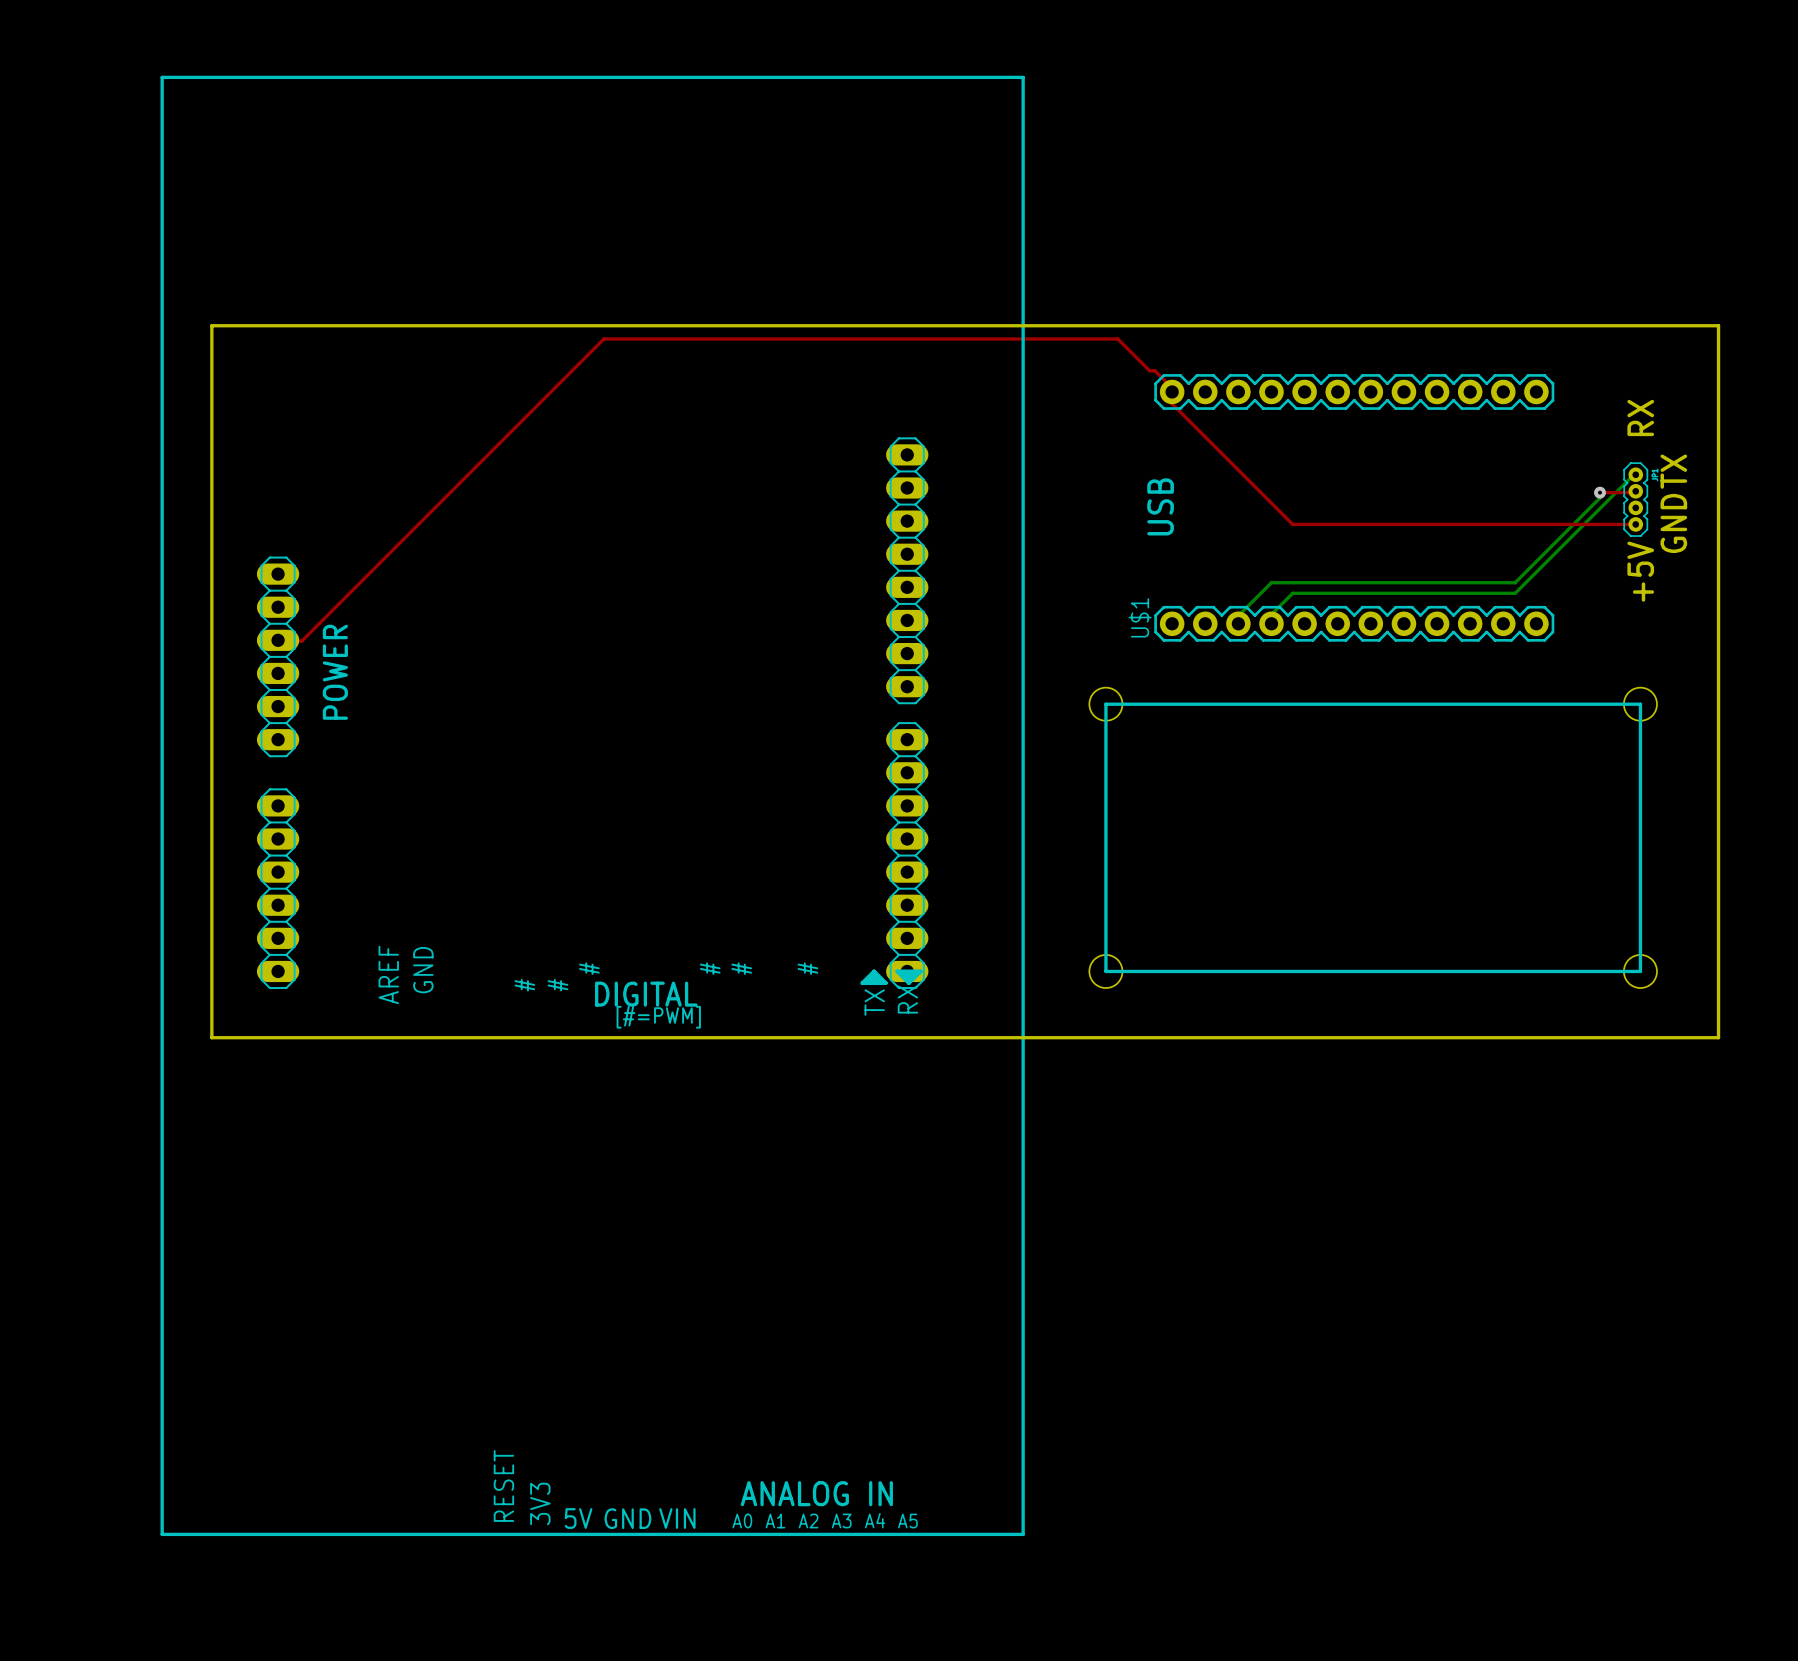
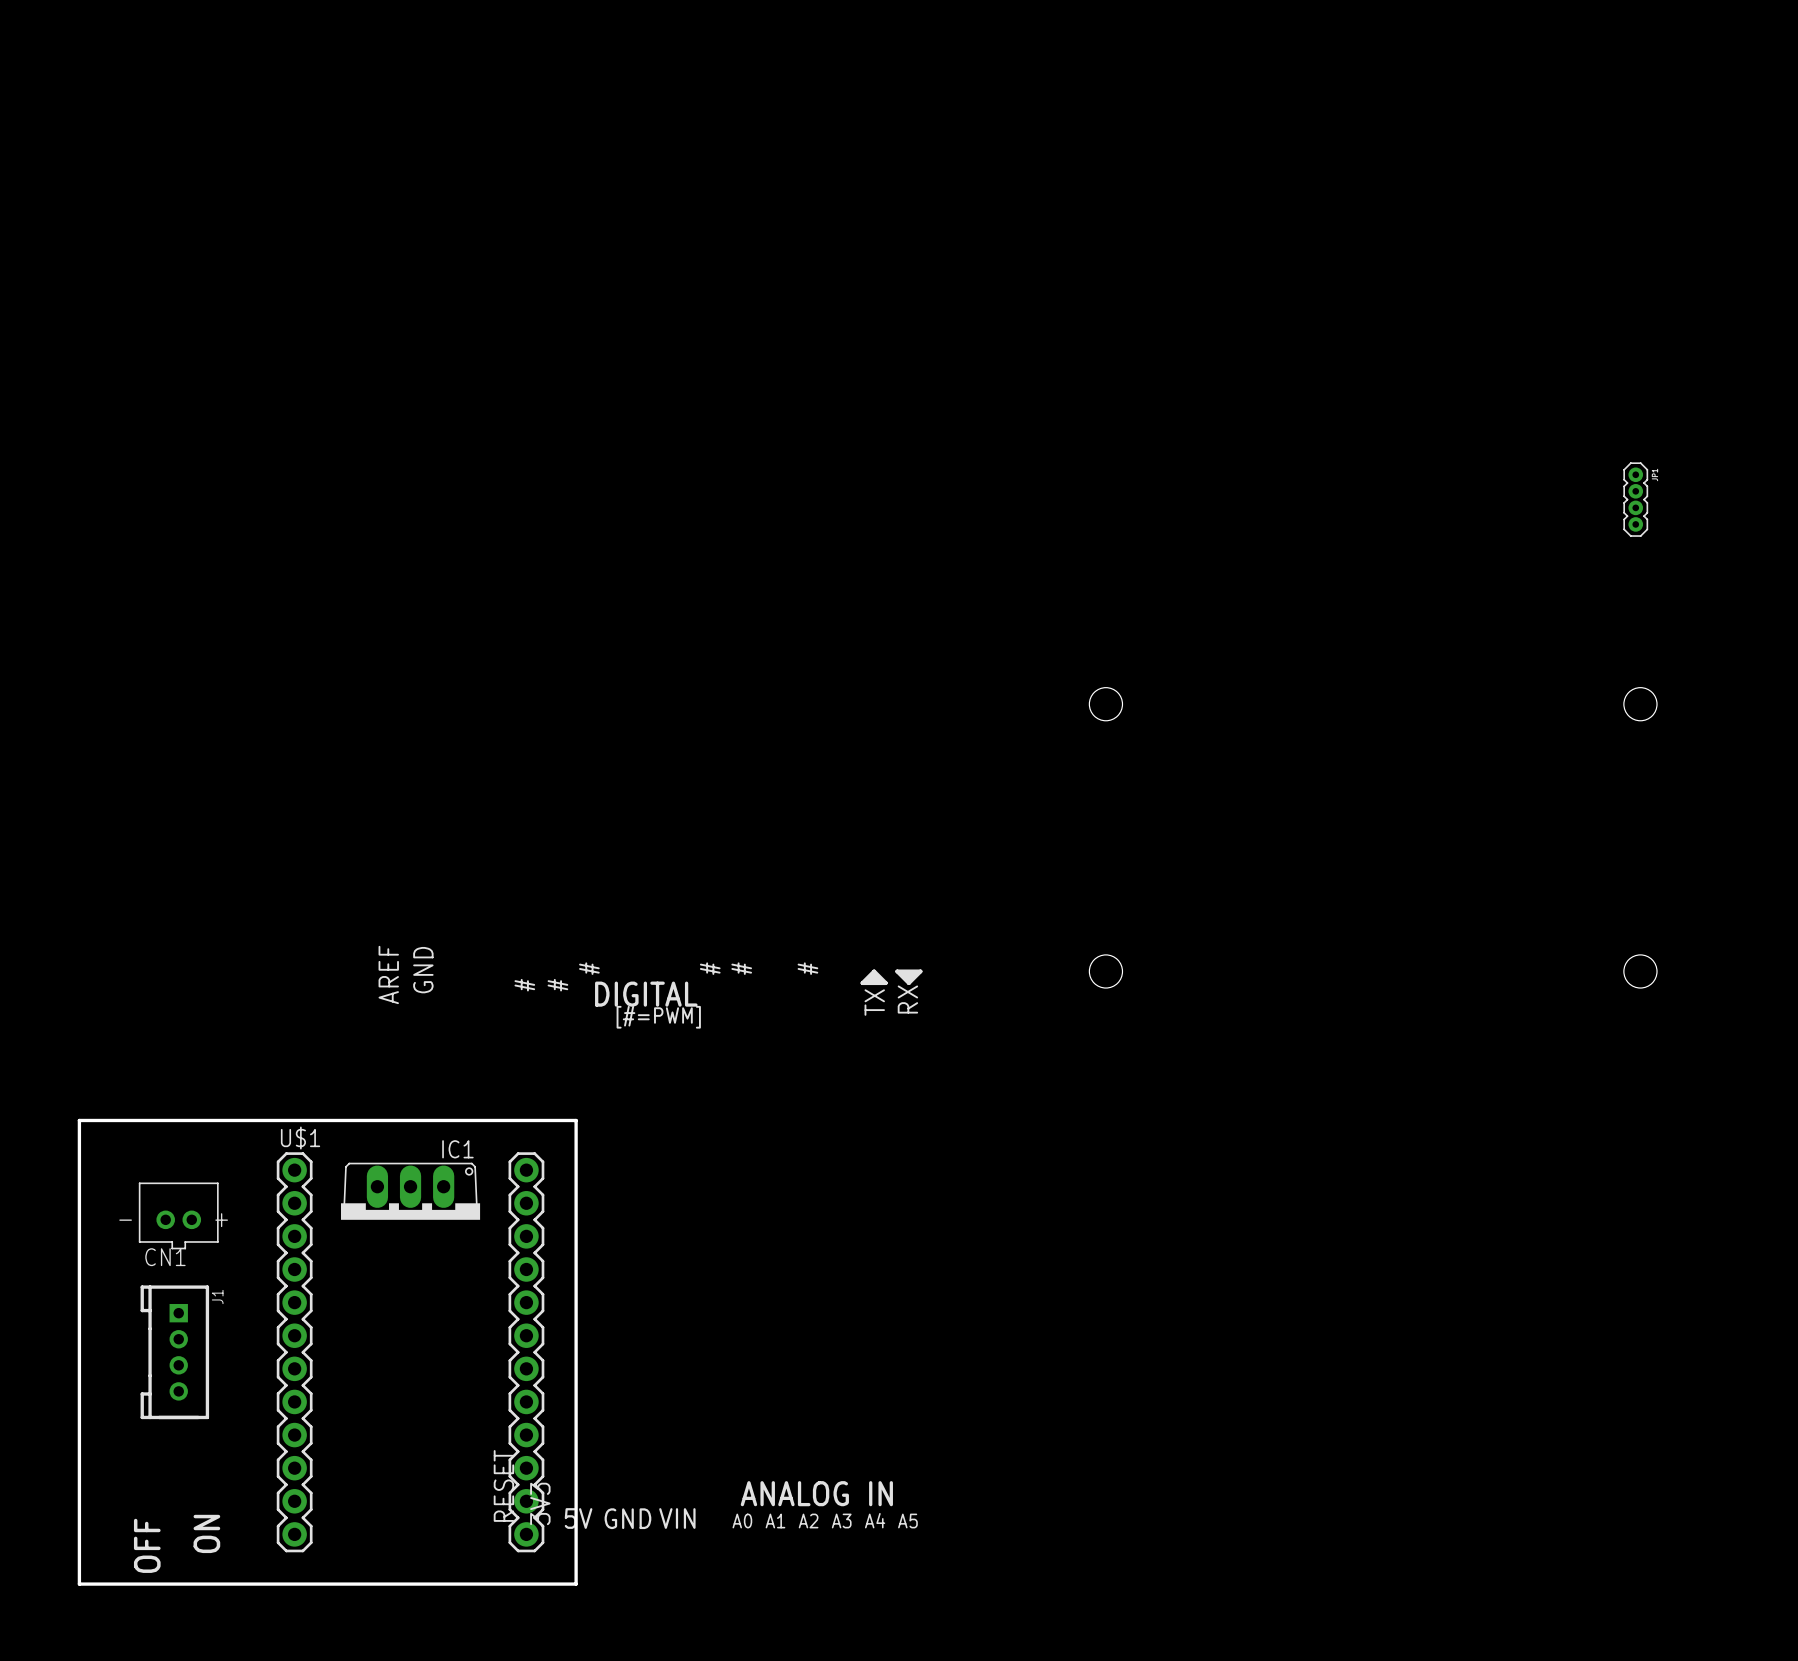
line: (162, 77) (162, 1534) (1023, 1534) (1023, 77) (162, 77) -> none
board edge: (211, 325) (211, 1037) (1718, 1037) (1718, 325) (211, 325) -> none
text: RX (1640, 418) -> none
text: TX (1673, 471) -> none
bottom track: (1635, 474) (1515, 593) (1292, 593) (1271, 614) (1271, 623) -> none
top track: (1635, 491) (1599, 492) -> none
bottom track: (1599, 492) (1599, 497) (1515, 582) (1271, 582) (1234, 619) (1238, 623) -> none
via: (1599, 492) -> none
text: USB (1160, 506) -> none
U$1 rotation: 0° (1354, 507) -> 90° clockwise (410, 1352)
U$1 position: (1354, 507) -> (410, 1352)
text: GND (1673, 523) -> none
top track: (1635, 524) (1292, 524) (1170, 402) (1170, 391) (1176, 391) (1154, 370) (1149, 370) (1117, 338) (603, 338) (301, 640) (278, 640) -> none
part: (907, 570) -> none
text: +5V (1640, 571) -> none
POWER: (278, 656) -> none
line: (1105, 704) (1105, 971) (1640, 971) (1640, 704) (1105, 704) -> none
part: (907, 855) -> none
part: (278, 888) -> none
board edge: none -> (79, 1120) (79, 1584) (576, 1584) (576, 1120) (79, 1120)
IC1: none -> (410, 1191)
CN1: none -> (178, 1215)
J1: none -> (174, 1352)
text: none -> ON (206, 1533)
text: none -> OFF (147, 1545)

